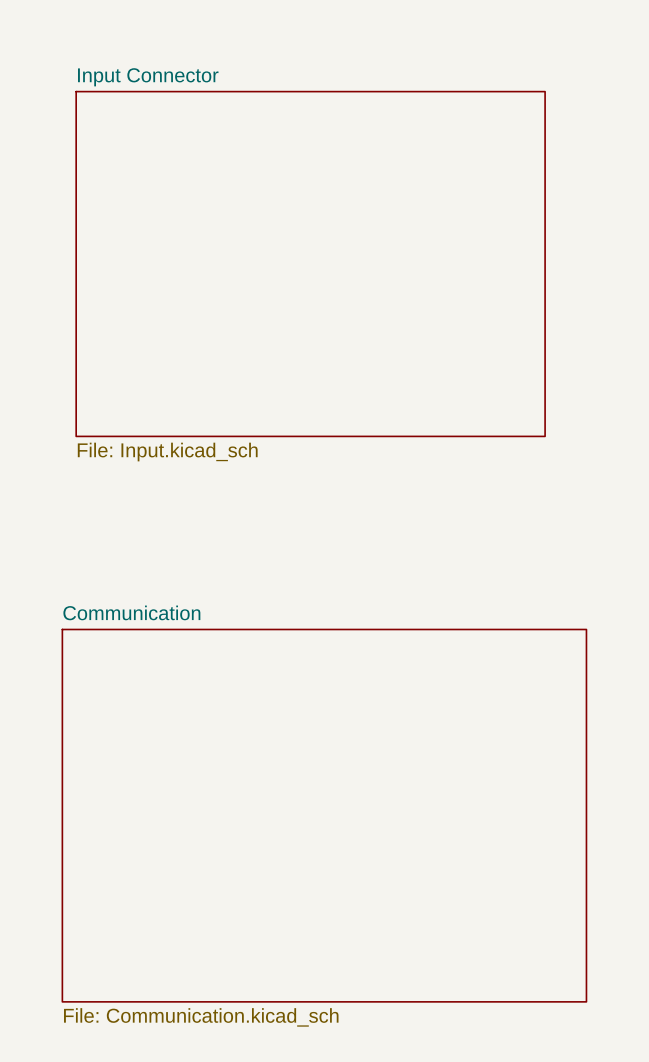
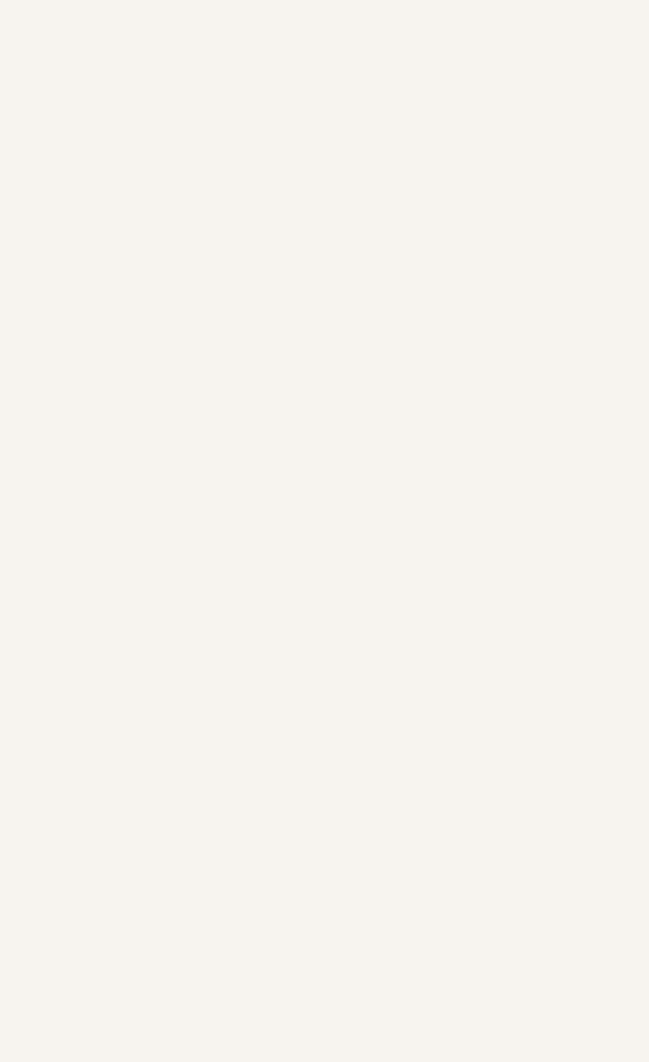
sheet Input Connector: File: Input.kicad_sch (310, 264) -> none
sheet Communication: File: Communication.kicad_sch (324, 815) -> none

